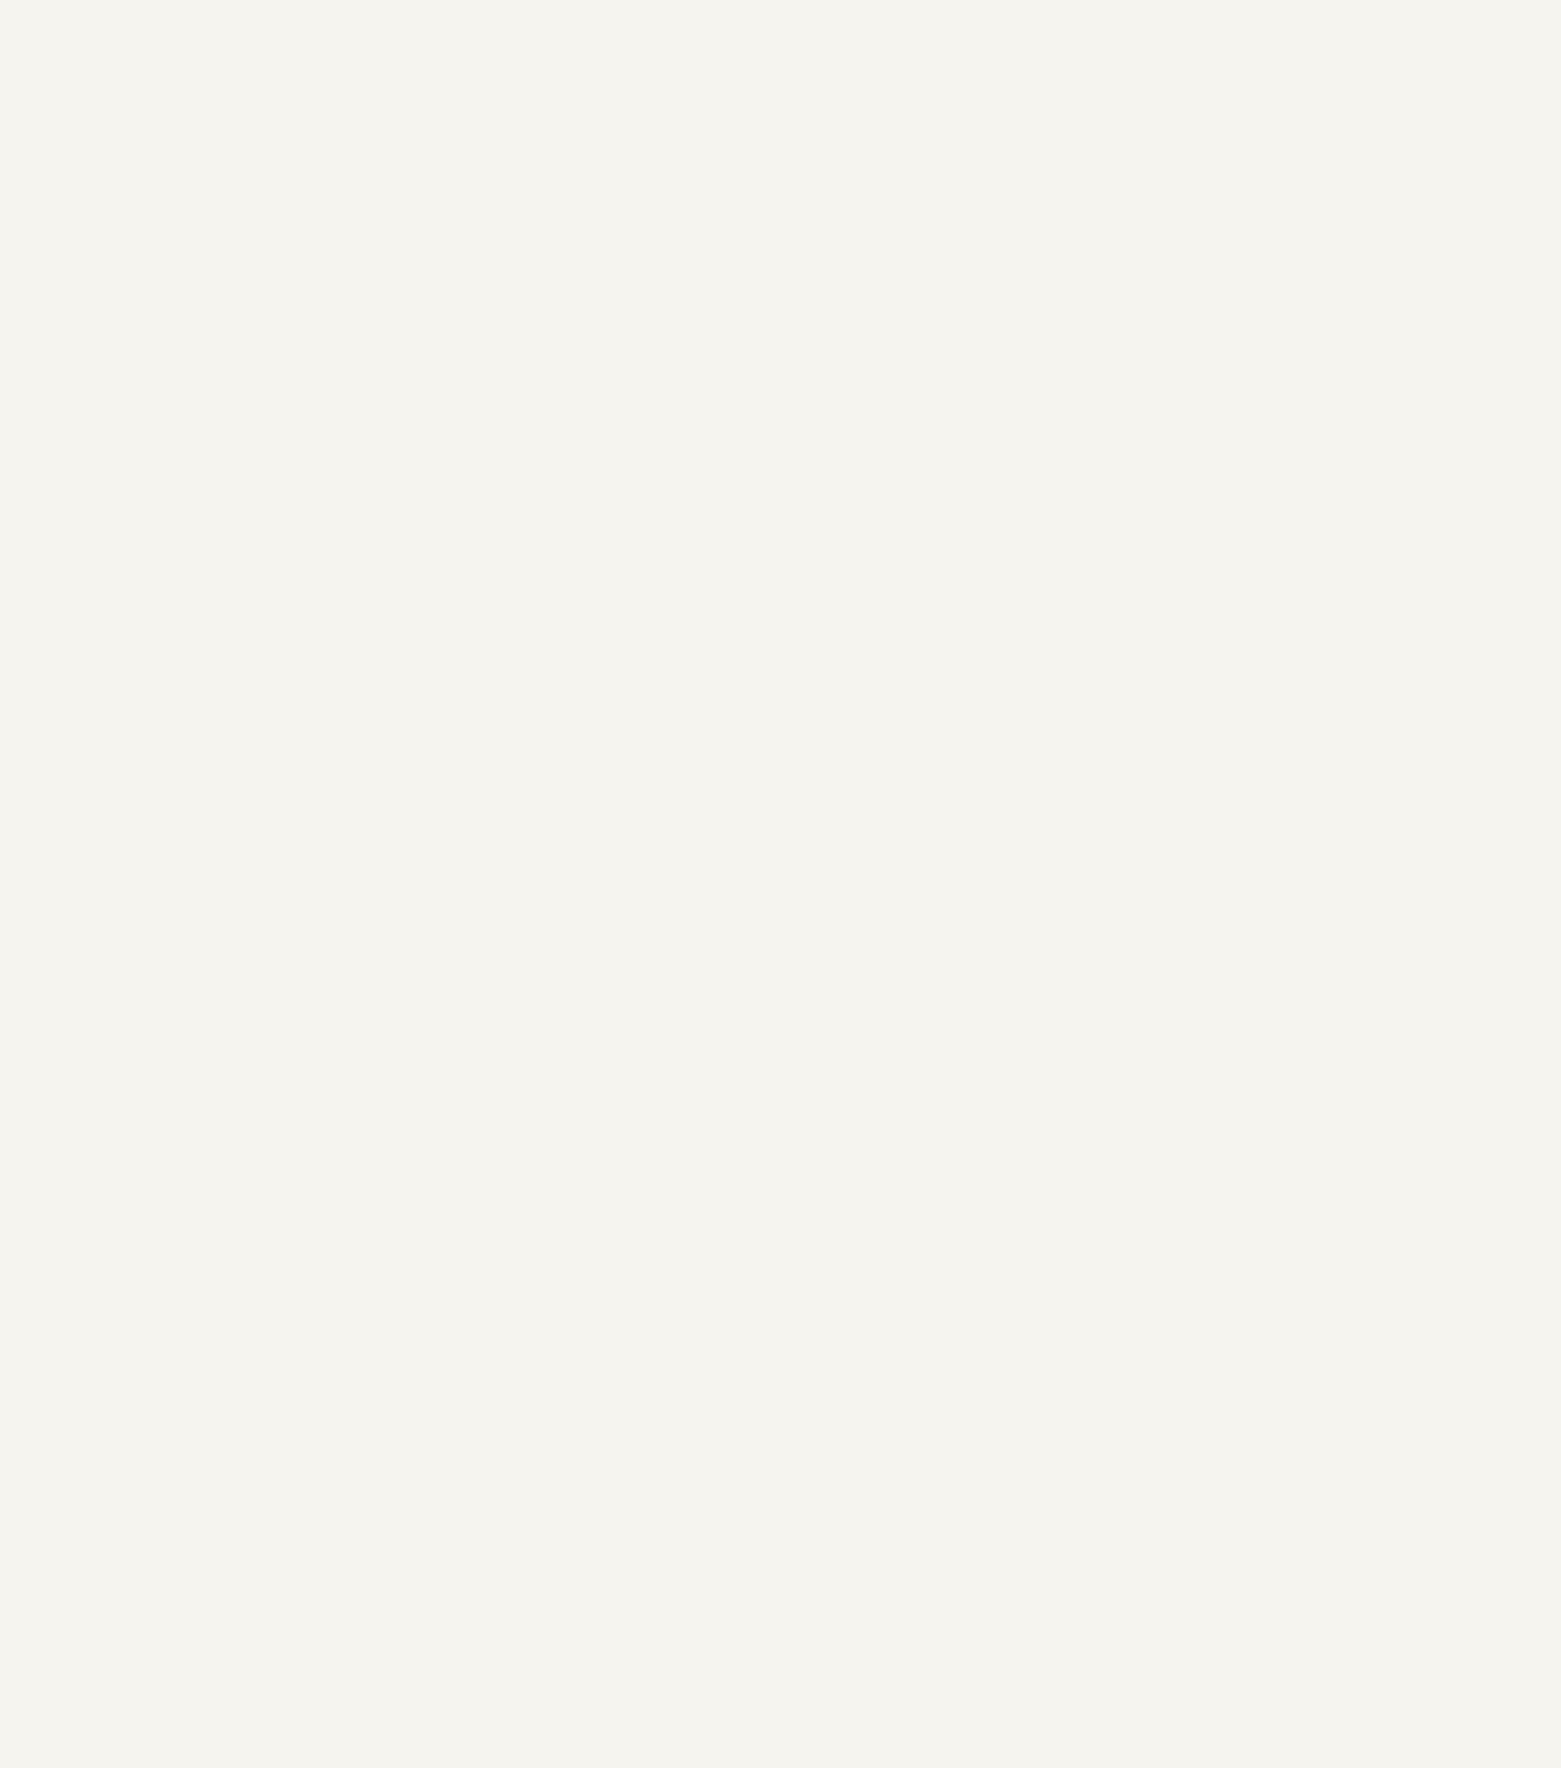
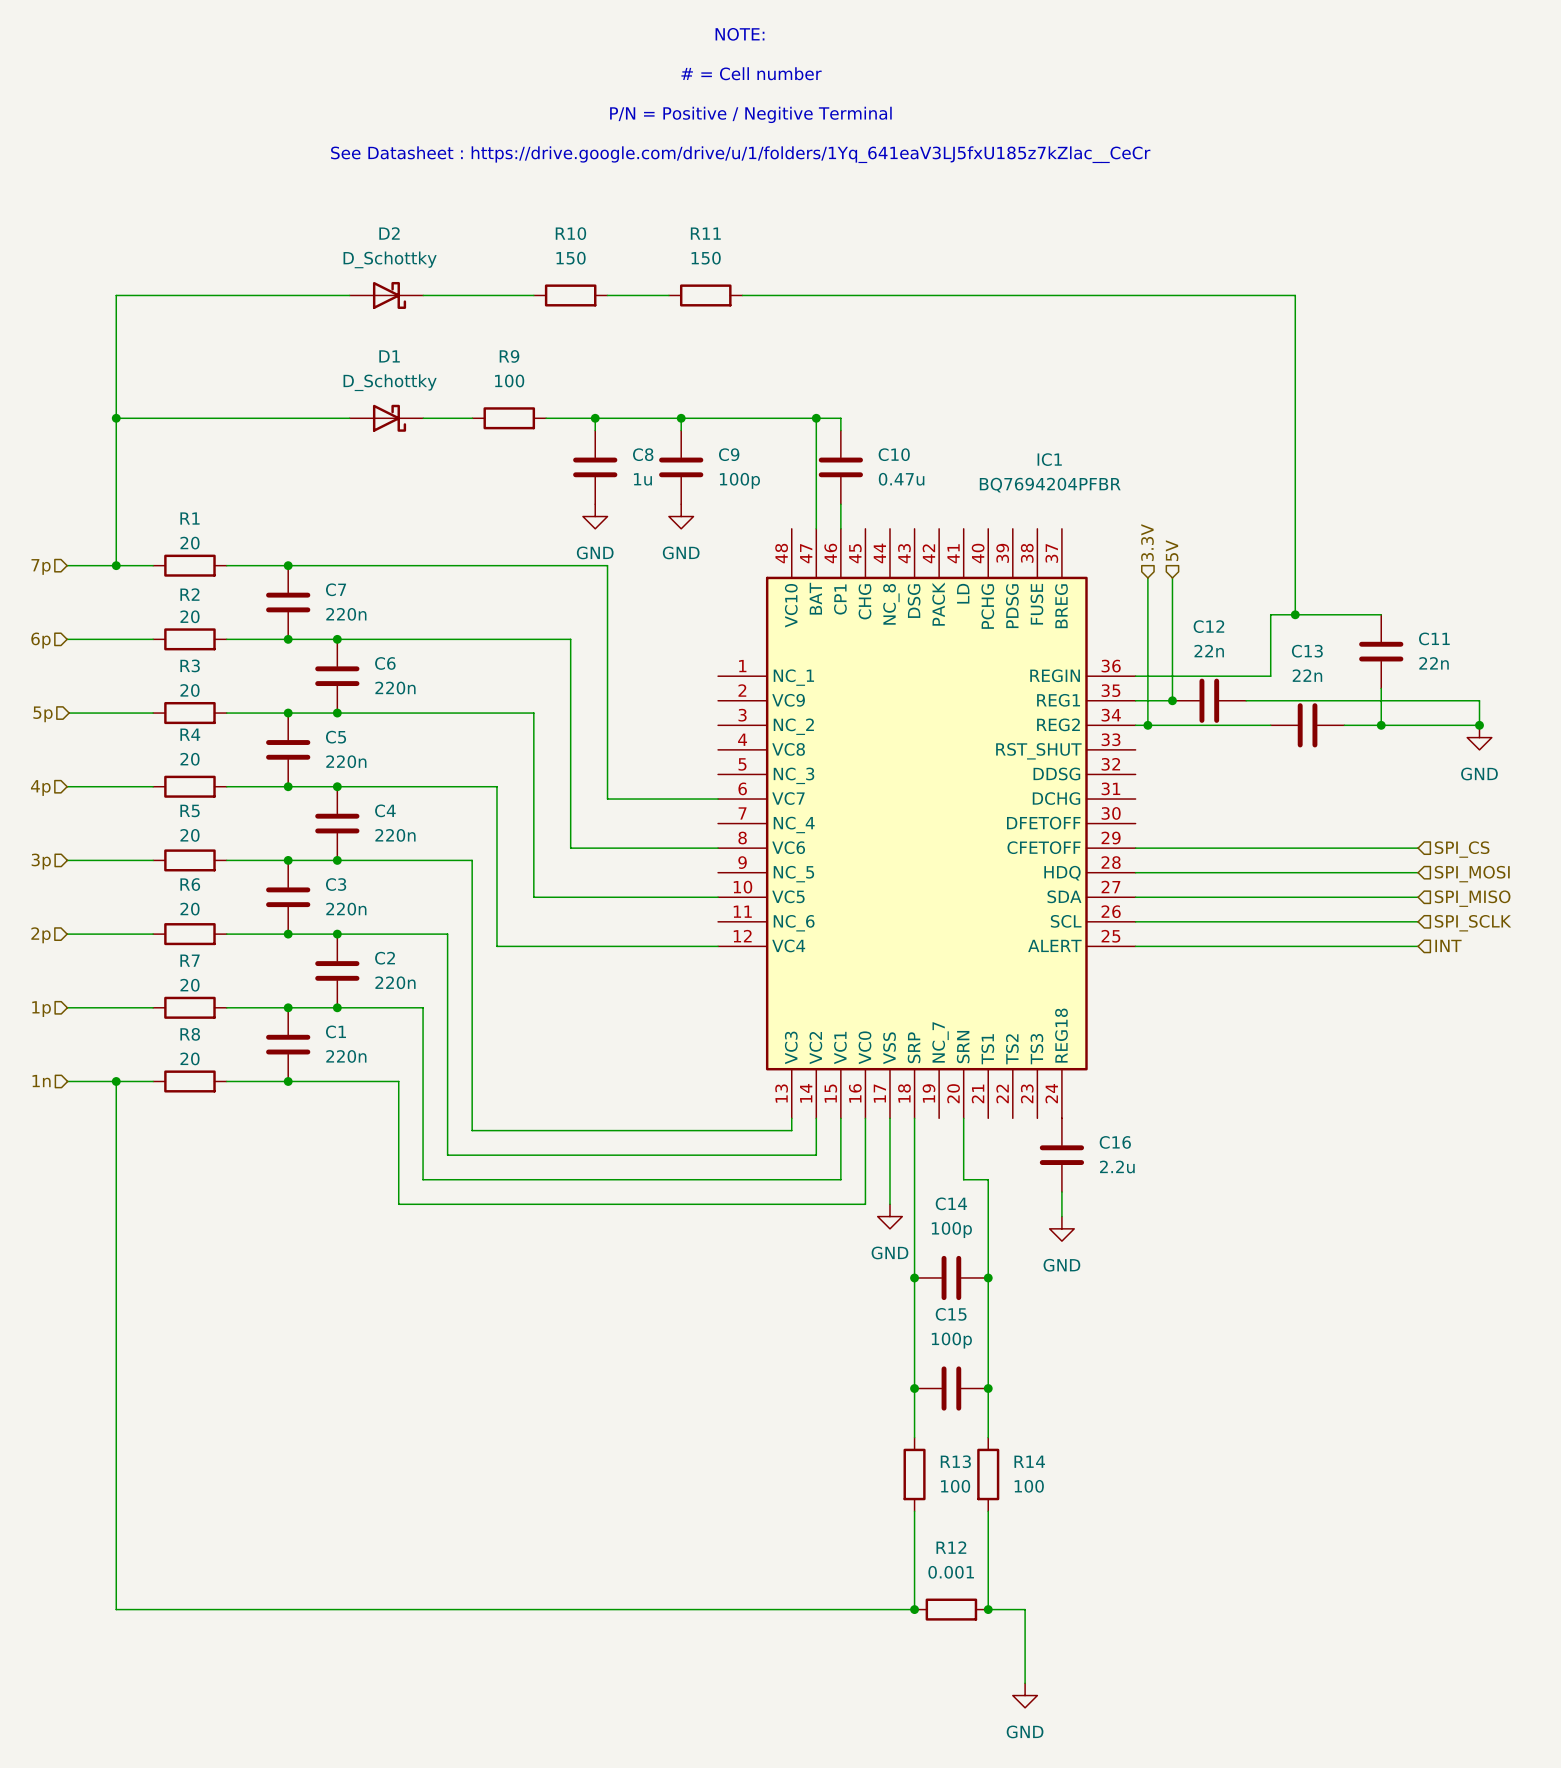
text: none -> NOTE: (740, 34)
text: none -> # = Cell number (751, 73)
text: none -> P/N = Positive / Negitive Terminal (750, 114)
text: none -> See Datasheet : https://drive.google.com/drive/u/1/folders/1Yq_641eaV3LJ5fxU185z7kZlac__CeCr (740, 154)
wire: none -> (349, 295) (116, 295) (116, 565)
D2: none -> D_Schottky (386, 295)
wire: none -> (423, 295) (533, 295)
R10: none -> 150 (570, 295)
wire: none -> (607, 295) (668, 295)
R11: none -> 150 (705, 295)
wire: none -> (742, 295) (1295, 295) (1295, 614)
wire: none -> (116, 418) (349, 418)
junction: none -> (116, 418)
D1: none -> D_Schottky (386, 418)
wire: none -> (423, 418) (472, 418)
R9: none -> 100 (509, 418)
wire: none -> (546, 418) (840, 418) (840, 430)
wire: none -> (595, 418) (595, 430)
junction: none -> (595, 418)
wire: none -> (681, 418) (681, 430)
junction: none -> (681, 418)
wire: none -> (816, 418) (816, 528)
junction: none -> (816, 418)
C8: none -> 1u (595, 467)
C9: none -> 100p (681, 467)
C10: none -> 0.47u (840, 467)
wire: none -> (840, 504) (840, 528)
power symbol: none -> GND (595, 516)
power symbol: none -> GND (681, 516)
hierarchical label: none -> 3.3V (1147, 542)
hierarchical label: none -> 5V (1172, 550)
wire: none -> (67, 565) (153, 565)
junction: none -> (116, 565)
R1: none -> 20 (189, 565)
wire: none -> (226, 565) (607, 565) (607, 799) (718, 799)
junction: none -> (288, 565)
hierarchical label: none -> 7p (41, 566)
wire: none -> (1147, 577) (1147, 725)
wire: none -> (1172, 577) (1172, 700) (1135, 700)
C7: none -> 220n (288, 602)
junction: none -> (1295, 614)
wire: none -> (1381, 614) (1270, 614) (1270, 676) (1135, 676)
wire: none -> (67, 639) (153, 639)
R2: none -> 20 (189, 639)
wire: none -> (226, 639) (570, 639) (570, 848) (718, 848)
junction: none -> (288, 639)
junction: none -> (337, 639)
hierarchical label: none -> 6p (40, 640)
C11: none -> 22n (1381, 651)
C6: none -> 220n (337, 676)
wire: none -> (1381, 688) (1381, 725)
junction: none -> (1172, 700)
C12: none -> 22n (1209, 700)
wire: none -> (1246, 700) (1479, 700) (1479, 725) (1344, 725)
wire: none -> (69, 713) (153, 713)
R3: none -> 20 (189, 713)
wire: none -> (226, 713) (533, 713) (533, 897) (718, 897)
junction: none -> (288, 713)
junction: none -> (337, 713)
hierarchical label: none -> 5p (43, 714)
wire: none -> (1135, 725) (1270, 725)
junction: none -> (1147, 725)
C13: none -> 22n (1307, 725)
junction: none -> (1381, 725)
junction: none -> (1479, 725)
power symbol: none -> GND (1479, 737)
C5: none -> 220n (288, 749)
wire: none -> (67, 786) (153, 786)
R4: none -> 20 (189, 786)
wire: none -> (226, 786) (496, 786) (496, 946) (718, 946)
junction: none -> (288, 786)
junction: none -> (337, 786)
hierarchical label: none -> 4p (40, 788)
C4: none -> 220n (337, 823)
IC1: none -> BQ7694204PFBR (926, 823)
wire: none -> (1135, 848) (1418, 848)
hierarchical label: none -> SPI_CS (1462, 849)
wire: none -> (67, 860) (153, 860)
R5: none -> 20 (189, 860)
wire: none -> (226, 860) (472, 860) (472, 1130) (791, 1130) (791, 1118)
junction: none -> (288, 860)
junction: none -> (337, 860)
hierarchical label: none -> 3p (41, 861)
wire: none -> (1135, 872) (1418, 872)
hierarchical label: none -> SPI_MOSI (1472, 874)
C3: none -> 220n (288, 897)
wire: none -> (1135, 897) (1418, 897)
hierarchical label: none -> SPI_MISO (1472, 898)
wire: none -> (1135, 921) (1418, 921)
hierarchical label: none -> SPI_SCLK (1472, 923)
wire: none -> (67, 934) (153, 934)
R6: none -> 20 (189, 934)
wire: none -> (226, 934) (447, 934) (447, 1155) (816, 1155) (816, 1118)
junction: none -> (288, 934)
junction: none -> (337, 934)
hierarchical label: none -> 2p (40, 935)
hierarchical label: none -> INT (1448, 945)
wire: none -> (1135, 946) (1418, 946)
C2: none -> 220n (337, 970)
wire: none -> (67, 1007) (153, 1007)
R7: none -> 20 (189, 1007)
wire: none -> (226, 1007) (423, 1007) (423, 1179) (840, 1179) (840, 1118)
junction: none -> (288, 1007)
junction: none -> (337, 1007)
hierarchical label: none -> 1p (41, 1009)
C1: none -> 220n (288, 1044)
hierarchical label: none -> 1n (41, 1081)
wire: none -> (67, 1081) (153, 1081)
wire: none -> (116, 1081) (116, 1609) (914, 1609) (914, 1511)
junction: none -> (116, 1081)
R8: none -> 20 (189, 1081)
wire: none -> (226, 1081) (398, 1081) (398, 1204) (865, 1204) (865, 1118)
junction: none -> (288, 1081)
wire: none -> (889, 1118) (889, 1204)
wire: none -> (914, 1118) (914, 1437)
wire: none -> (963, 1118) (963, 1179) (988, 1179) (988, 1437)
C16: none -> 2.2u (1061, 1155)
wire: none -> (1061, 1192) (1061, 1216)
power symbol: none -> GND (889, 1216)
power symbol: none -> GND (1061, 1228)
junction: none -> (914, 1277)
C14: none -> 100p (951, 1277)
junction: none -> (988, 1277)
junction: none -> (914, 1388)
C15: none -> 100p (951, 1388)
junction: none -> (988, 1388)
R13: none -> 100 (914, 1474)
R14: none -> 100 (988, 1474)
wire: none -> (988, 1511) (988, 1609) (1025, 1609) (1025, 1683)
junction: none -> (914, 1609)
R12: none -> 0.001 (951, 1609)
junction: none -> (988, 1609)
power symbol: none -> GND (1025, 1695)

